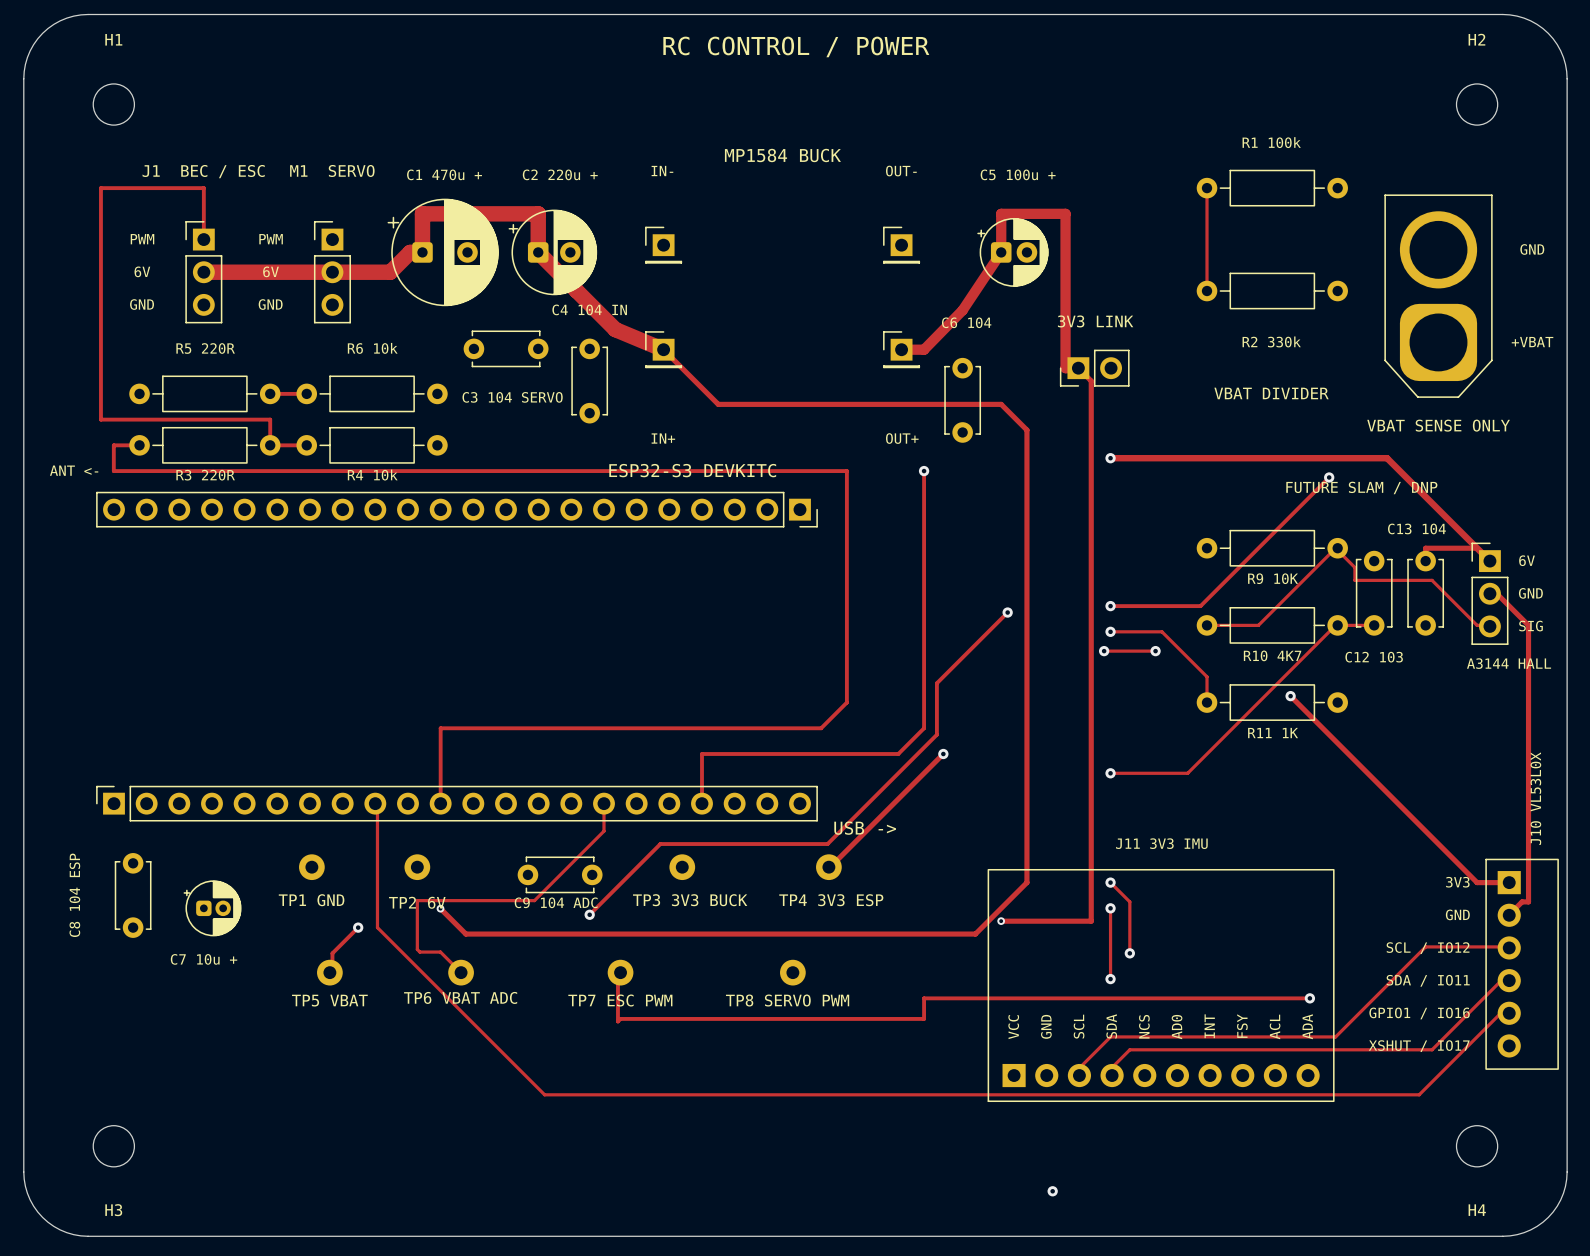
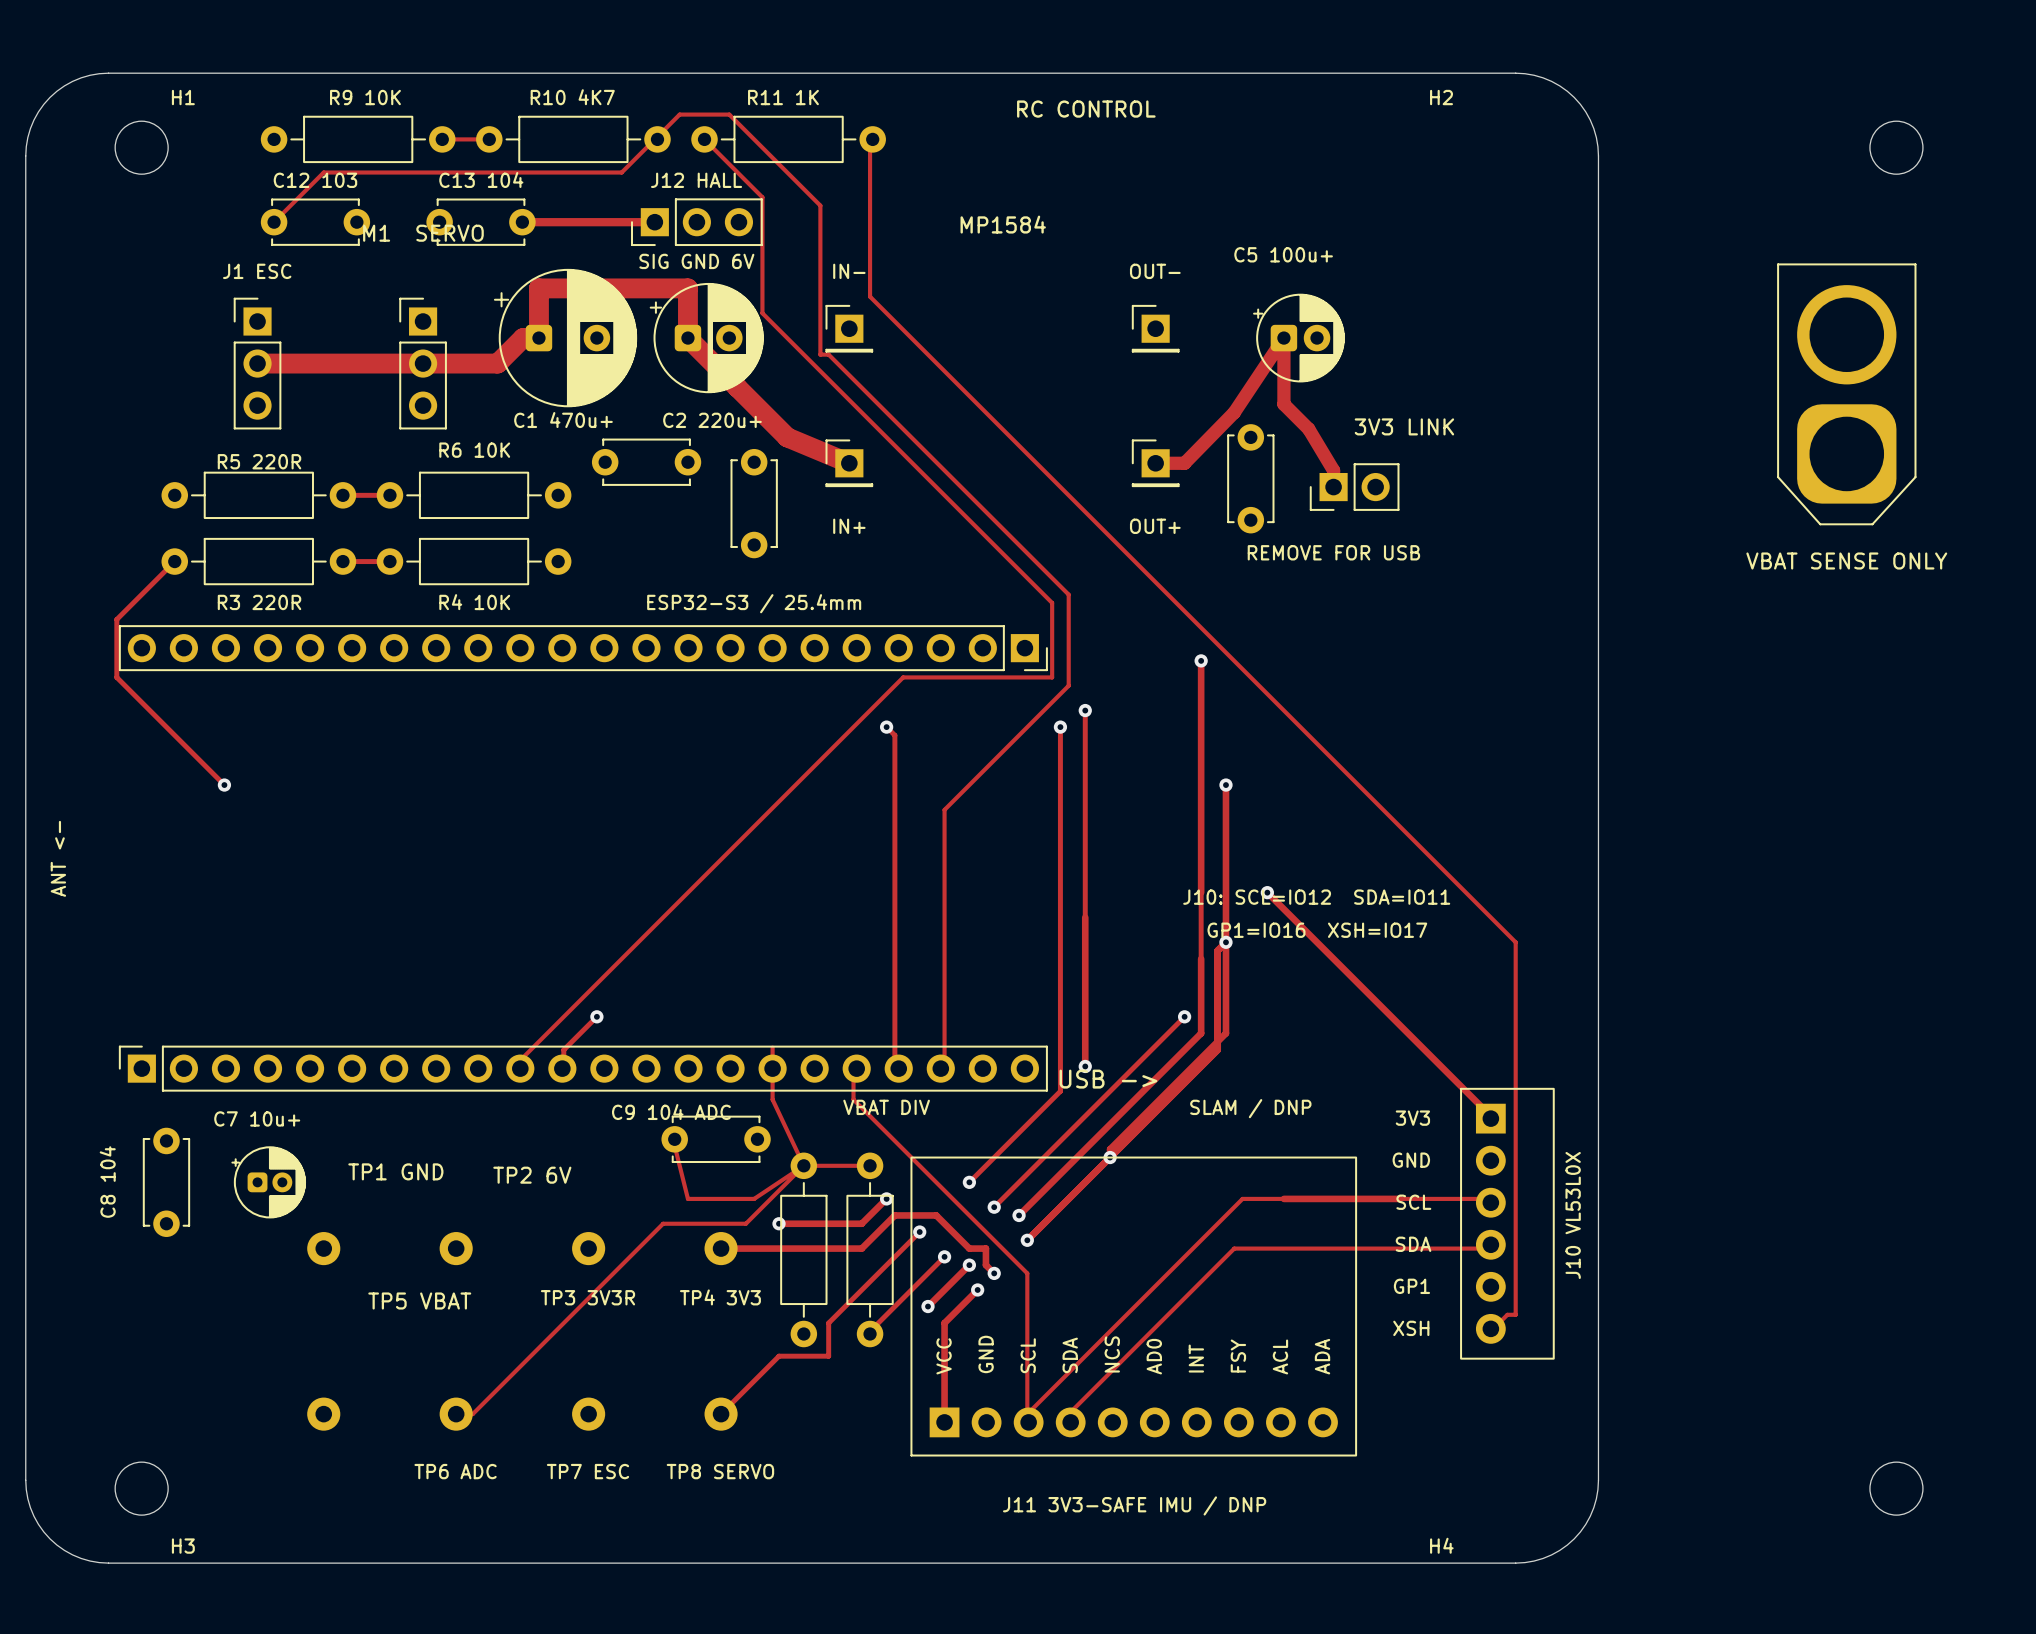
text position: H1 (113, 39) -> H1 (183, 97)
text: H2 (1476, 39) -> none
text: RC CONTROL / POWER (796, 46) -> RC CONTROL (1086, 109)
text: none -> R9 10K (365, 97)
text: none -> R10 4K7 (572, 97)
text: none -> R11 1K (783, 97)
text: none -> H2 (1441, 97)
part: none -> (358, 139)
track: none -> (442, 139) (489, 139)
part: none -> (573, 139)
track: none -> (704, 139) (762, 197) (762, 313) (1052, 602) (1052, 677) (903, 677) (522, 1058) (522, 1066) (520, 1068)
part: none -> (788, 139)
track: none -> (872, 139) (870, 139) (870, 296) (1515, 942) (1515, 1314) (1507, 1314) (1490, 1331) (1490, 1328)
board edge: (23, 110) (24, 71) (27, 57) (33, 44) (42, 33) (60, 20) (73, 16) (88, 14) (1502, 14) (1517, 16) (1530, 20) (1548, 33) (1557, 44) (1563, 57) (1567, 78) (1567, 1171) (1565, 1186) (1557, 1206) (1548, 1217) (1537, 1226) (1524, 1232) (1502, 1236) (80, 1235) (66, 1232) (53, 1226) (42, 1217) (33, 1206) (27, 1193) (24, 1179) (23, 1139) -> (25, 155) (30, 128) (38, 111) (50, 97) (72, 81) (90, 75) (108, 73) (1515, 73) (1534, 75) (1551, 81) (1574, 97) (1590, 120) (1596, 137) (1598, 155) (1598, 1480) (1596, 1498) (1590, 1516) (1580, 1531) (1567, 1545) (1543, 1558) (1515, 1563) (108, 1563) (81, 1558) (64, 1550) (50, 1538) (38, 1524) (30, 1507) (25, 1480)
text: none -> C12 103 (315, 180)
text: none -> C13 104 (481, 179)
text: none -> J12 HALL (696, 180)
text: R1 100k (1271, 142) -> none
text: MP1584 BUCK (782, 155) -> MP1584 (1003, 224)
track: none -> (274, 222) (323, 172) (621, 172) (679, 114) (729, 114) (820, 205) (820, 354) (828, 354) (1068, 594) (1068, 685) (944, 809) (944, 1066) (940, 1068)
part: none -> (315, 222)
part: none -> (481, 222)
track: none -> (522, 222) (654, 222)
part: none -> (696, 222)
text: J1 BEC / ESC (203, 171) -> none
text position: IN- (662, 171) -> IN- (849, 271)
text position: OUT- (901, 171) -> OUT- (1155, 271)
text: C1 470u + (444, 174) -> none
text: C2 220u + (560, 174) -> none
text: C5 100u + (1018, 174) -> C5 100u+ (1283, 254)
track: (1207, 188) (1207, 291) -> none
part: (1272, 188) -> none
text: none -> SIG GND 6V (696, 261)
text: none -> J1 ESC (257, 271)
text: PWM (142, 239) -> none
track: (203, 239) (203, 188) (100, 188) (100, 419) (270, 419) (270, 445) (306, 445) -> none
text: PWM (271, 239) -> none
text: GND (1532, 249) -> none
track: (1001, 252) (1001, 213) (1065, 213) (1065, 368) (1078, 368) (1091, 381) (1091, 921) -> (1283, 338) (1283, 404) (1308, 429) (1333, 470) (1333, 487)
text: 6V (142, 271) -> none
text: 6V (270, 271) -> none
part: (1272, 291) -> none
text: GND (142, 304) -> none
text: GND (270, 304) -> none
text: C4 104 IN (589, 309) -> none
text: none -> C1 470u+ (563, 420)
text: none -> C2 220u+ (712, 420)
text: C6 104 (966, 322) -> none
text: R2 330k (1271, 341) -> none
text: +VBAT (1532, 342) -> none
text: R6 10k (372, 348) -> R6 10K (474, 450)
track: (663, 349) (718, 404) (1001, 404) (1026, 430) (1026, 882) (975, 934) (731, 934) -> (994, 1273) (985, 1265) (985, 1248) (969, 1248) (936, 1215)
part position: (1094, 368) -> (1354, 487)
part: none -> (258, 495)
part: none -> (474, 495)
part: (204, 393) -> none
track: (270, 393) (306, 393) -> (342, 495) (389, 495)
part: (372, 393) -> none
text: VBAT DIVIDER (1271, 393) -> none
text: C3 104 SERVO (512, 397) -> none
part position: (962, 400) -> (1250, 478)
text: none -> REMOVE FOR USB (1333, 552)
track: none -> (174, 561) (116, 619) (116, 677) (224, 785)
part: none -> (258, 561)
track: none -> (342, 561) (389, 561)
part: none -> (474, 561)
text position: IN+ (663, 438) -> IN+ (849, 526)
text position: OUT+ (902, 438) -> OUT+ (1155, 526)
track: (139, 445) (113, 445) (113, 471) (846, 471) (846, 541) -> none
part: (204, 445) -> none
part: (372, 445) -> none
text: none -> ESP32-S3 / 25.4mm (754, 603)
track: (1110, 458) (1387, 458) (1489, 561) (1477, 548) (1425, 548) (1425, 561) -> none
via: (1110, 458) -> none
text rotation: 0° (74, 470) -> 90° counterclockwise (58, 858)
text position: ANT <- (74, 470) -> ANT <- (58, 858)
text: ESP32-S3 DEVKITC (692, 470) -> none
track: (924, 471) (924, 728) (898, 754) (701, 754) (701, 803) -> none
via position: (924, 471) -> (1201, 660)
text position: R3 220R (205, 475) -> R3 220R (259, 602)
text: R4 10k (372, 475) -> R4 10K (474, 602)
track: (1329, 477) (1200, 606) (1110, 606) -> none
via: (1329, 477) -> none
text: FUTURE SLAM / DNP (1361, 487) -> none
part position: (456, 509) -> (583, 648)
text: C13 104 (1416, 528) -> none
via: none -> (1085, 710)
part: (1272, 548) -> none
track: (1335, 548) (1258, 625) (1207, 625) -> none
track: (1335, 548) (1354, 567) (1354, 580) (1432, 580) (1477, 625) (1489, 626) -> none
track: none -> (886, 727) (894, 735) (894, 1066) (898, 1068)
via: none -> (886, 727)
track: none -> (1060, 727) (1060, 1091) (969, 1182)
via: none -> (1060, 727)
text: 6V (1527, 560) -> none
text: R9 10K (1273, 578) -> none
part: (1374, 593) -> none
part: (1425, 593) -> none
track: (1489, 593) (1496, 593) (1528, 625) (1528, 901) (1522, 901) (1509, 915) -> none
part: (1489, 593) -> none
text: GND (1530, 593) -> none
via: none -> (224, 785)
track: none -> (1225, 785) (1225, 1033) (1110, 1149) (1110, 1157)
via: none -> (1225, 785)
via: (1110, 606) -> none
track: (1007, 612) (936, 683) -> (1201, 660) (1201, 892)
via: (1007, 612) -> none
part: (1272, 625) -> none
track: (1374, 625) (1335, 625) (1187, 773) (1110, 773) -> none
text: SIG (1531, 626) -> none
track: (1110, 631) (1161, 631) (1207, 676) (1207, 702) -> none
via: (1110, 631) -> none
track: (1104, 651) (1155, 651) -> none
via: (1104, 651) -> none
via: (1155, 651) -> none
text: R10 4K7 (1272, 655) -> none
text: C12 103 (1374, 657) -> none
text: A3144 HALL (1509, 663) -> none
track: none -> (1267, 892) (1490, 1116) (1490, 1118)
via: none -> (1267, 892)
text: none -> J10: SCL=IO12 SDA=IO11 (1316, 897)
track: (1290, 696) (1477, 882) (1509, 882) -> none
via: (1290, 696) -> none
track: (846, 702) (821, 728) (440, 728) (440, 803) -> (1085, 917) (1085, 1066)
part: (1272, 702) -> none
text: none -> GP1=IO16 XSH=IO17 (1317, 930)
track: none -> (1225, 942) (1217, 950) (1217, 1049) (1027, 1240)
via: none -> (1225, 942)
text: R11 1K (1273, 733) -> none
track: (936, 734) (827, 844) (660, 844) (589, 914) -> (1201, 958) (1201, 1033) (1019, 1215)
track: (943, 754) (827, 869) (828, 867) -> none
via: (943, 754) -> none
via: (1110, 773) -> none
track: none -> (596, 1016) (563, 1049) (562, 1068)
via: none -> (596, 1016)
track: none -> (1184, 1016) (994, 1207)
via: none -> (1184, 1016)
track: (375, 803) (377, 805) (377, 927) (544, 1094) (801, 1094) -> (856, 1068) (853, 1066) (853, 1099) (1027, 1273) (1027, 1422)
part position: (456, 803) -> (583, 1068)
via: none -> (1085, 1066)
track: (603, 831) (534, 900) (417, 900) (417, 949) (419, 952) (440, 952) (461, 972) -> (772, 1083) (772, 1099) (803, 1165)
text: J11 3V3 IMU (1161, 843) -> none
text: none -> VBAT DIV (886, 1107)
text: none -> SLAM / DNP (1250, 1108)
text: none -> 3V3 (1412, 1118)
text: none -> C7 10u+ (257, 1118)
part: (311, 867) -> none
part: (417, 867) -> none
part: (682, 867) -> none
part: (828, 867) -> none
track: none -> (674, 1145) (687, 1198) (754, 1198) (803, 1165)
track: (1110, 882) (1129, 901) (1129, 953) -> none
via: (1110, 882) -> none
via: none -> (1110, 1157)
text: none -> GND (1411, 1160)
text: C8 104 ESP (74, 895) -> C8 104 (107, 1182)
part position: (133, 895) -> (166, 1182)
track: none -> (803, 1165) (870, 1165)
track: none -> (803, 1165) (745, 1223) (663, 1223) (472, 1414) (456, 1414)
text: TP3 3V3 BUCK (690, 900) -> none
text: TP4 3V3 ESP (831, 900) -> none
text position: C9 104 ADC (556, 902) -> C9 104 ADC (671, 1112)
track: (440, 908) (465, 934) (699, 934) -> (721, 1248) (861, 1248) (894, 1215)
via: (440, 908) -> none
via: none -> (969, 1182)
track: (1110, 908) (1110, 979) -> none
via: (1110, 908) -> none
via position: (589, 914) -> (779, 1223)
track: none -> (886, 1198) (861, 1223) (779, 1223)
via: none -> (886, 1198)
track: none -> (1283, 1198) (1242, 1198) (1027, 1414)
via: (1001, 921) -> none
track: none -> (1399, 1198) (1490, 1198) (1490, 1202)
text: none -> SCL (1413, 1202)
track: (358, 927) (332, 953) (332, 972) (329, 972) -> none
via: (358, 927) -> none
via: none -> (994, 1207)
text: none -> J10 VL53L0X (1573, 1215)
via: none -> (1019, 1215)
part: none -> (1507, 1223)
track: none -> (919, 1232) (828, 1323) (828, 1356) (779, 1356) (721, 1414)
via: none -> (919, 1232)
track: (1509, 947) (1425, 946) (1335, 1036) (1110, 1036) (1078, 1069) (1079, 1075) -> none
via: none -> (1027, 1240)
via: (1129, 953) -> none
text: none -> SDA (1413, 1244)
text: C7 10u + (204, 959) -> none
part: none -> (323, 1248)
part: none -> (803, 1249)
part: none -> (870, 1249)
part: (1522, 964) -> none
track: none -> (944, 1256) (870, 1331) (870, 1334)
via: none -> (944, 1256)
part position: (329, 972) -> (456, 1248)
part position: (461, 972) -> (588, 1248)
track: (620, 972) (617, 975) (617, 1021) (620, 1018) (924, 1018) (924, 998) (1309, 998) -> none
part position: (620, 972) -> (721, 1248)
track: none -> (969, 1265) (928, 1306)
via: none -> (969, 1265)
part: (792, 972) -> none
via: none -> (994, 1273)
via: (1110, 979) -> none
track: (1509, 980) (1509, 979) (1502, 979) (1432, 1049) (1129, 1049) (1110, 1069) (1110, 1075) (1112, 1075) -> none
part position: (1161, 985) -> (1133, 1306)
text: none -> GP1 (1411, 1286)
track: none -> (977, 1289) (944, 1323) (944, 1422)
via: none -> (977, 1289)
text: TP6 VBAT ADC (460, 997) -> TP3 3V3R (587, 1297)
text: none -> TP4 3V3 (720, 1297)
via: (1309, 998) -> none
text: TP7 ESC PWM (620, 1000) -> none
text: TP8 SERVO PWM (787, 1000) -> none
via: none -> (928, 1306)
track: (1509, 1013) (1509, 1011) (1502, 1011) (1419, 1094) (835, 1094) -> none
text: none -> XSH (1411, 1328)
part: none -> (323, 1414)
part: none -> (456, 1414)
part: none -> (588, 1414)
part: none -> (721, 1414)
track: (802, 1094) (834, 1094) -> (1490, 1244) (1490, 1248) (1234, 1248) (1068, 1414) (1068, 1422)
text: none -> TP6 ADC (455, 1471)
text: none -> TP7 ESC (587, 1471)
text: none -> TP8 SERVO (720, 1471)
text: none -> J11 3V3-SAFE IMU / DNP (1134, 1505)
text: none -> H4 (1441, 1545)
via: (1052, 1191) -> none
text position: H3 (113, 1210) -> H3 (183, 1546)
text: H4 (1477, 1210) -> none

